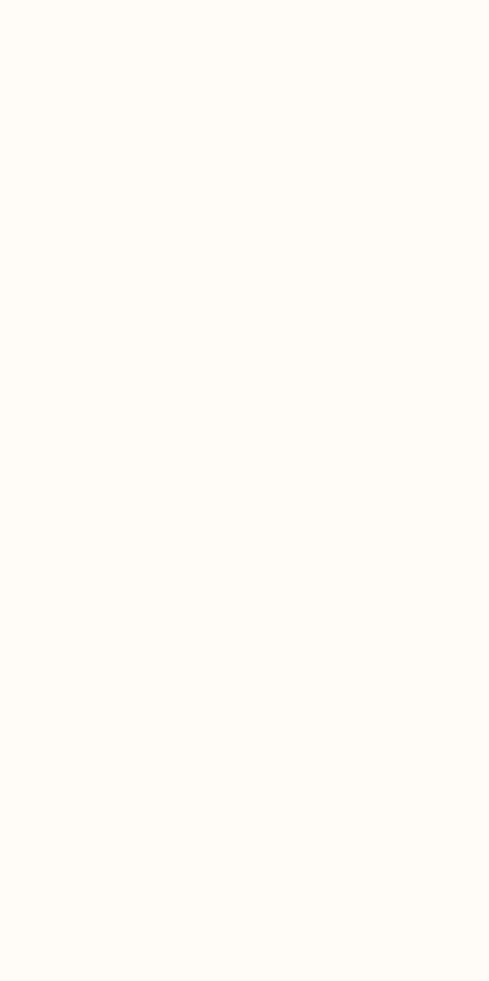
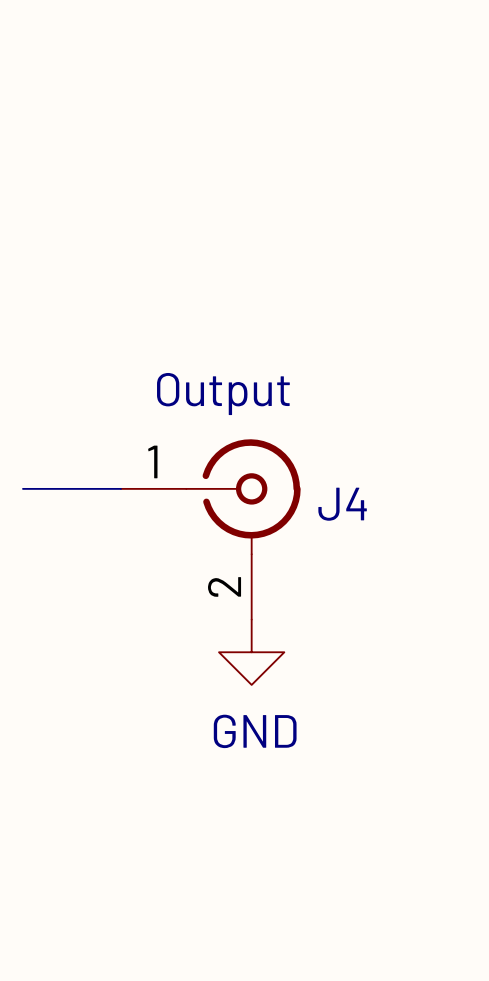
wire: none -> (22, 488) (120, 488)
J4: none -> Output (210, 529)
power symbol: none -> GND (251, 652)

